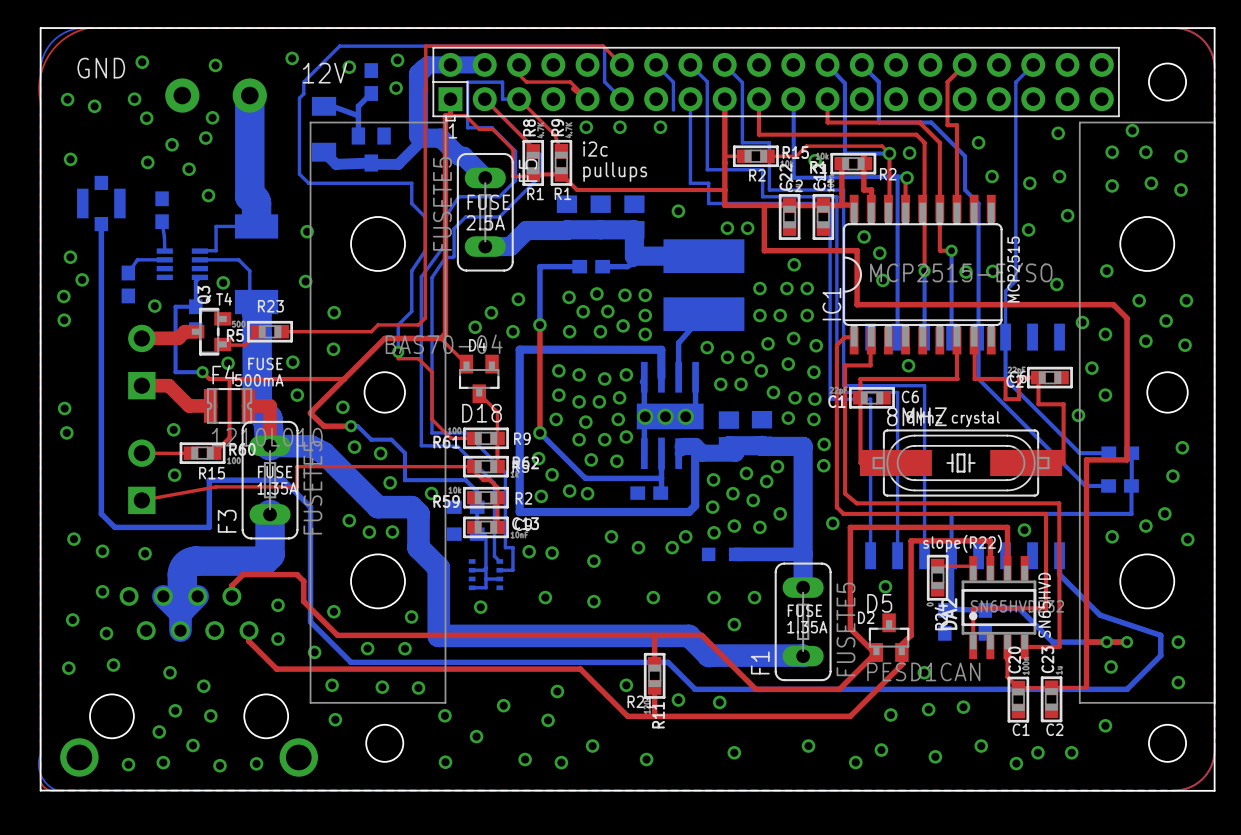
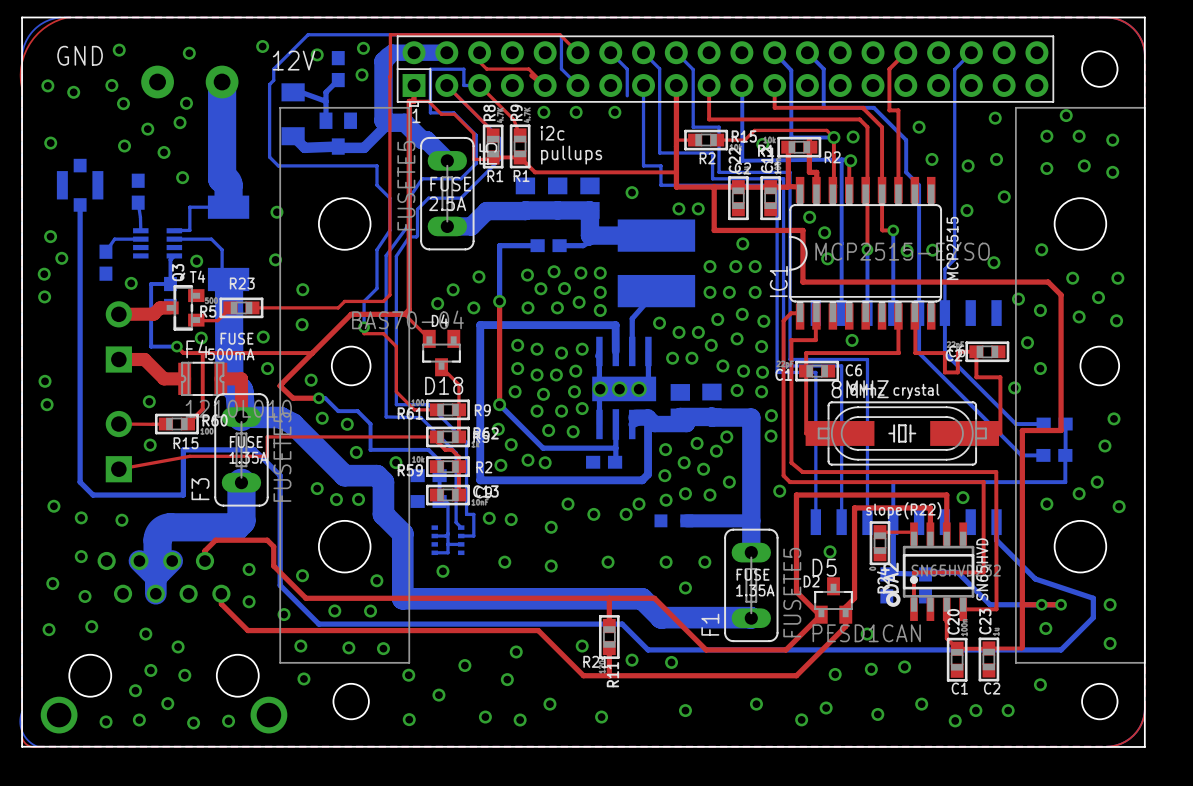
drawing: none -> [885, 592, 901, 607]

